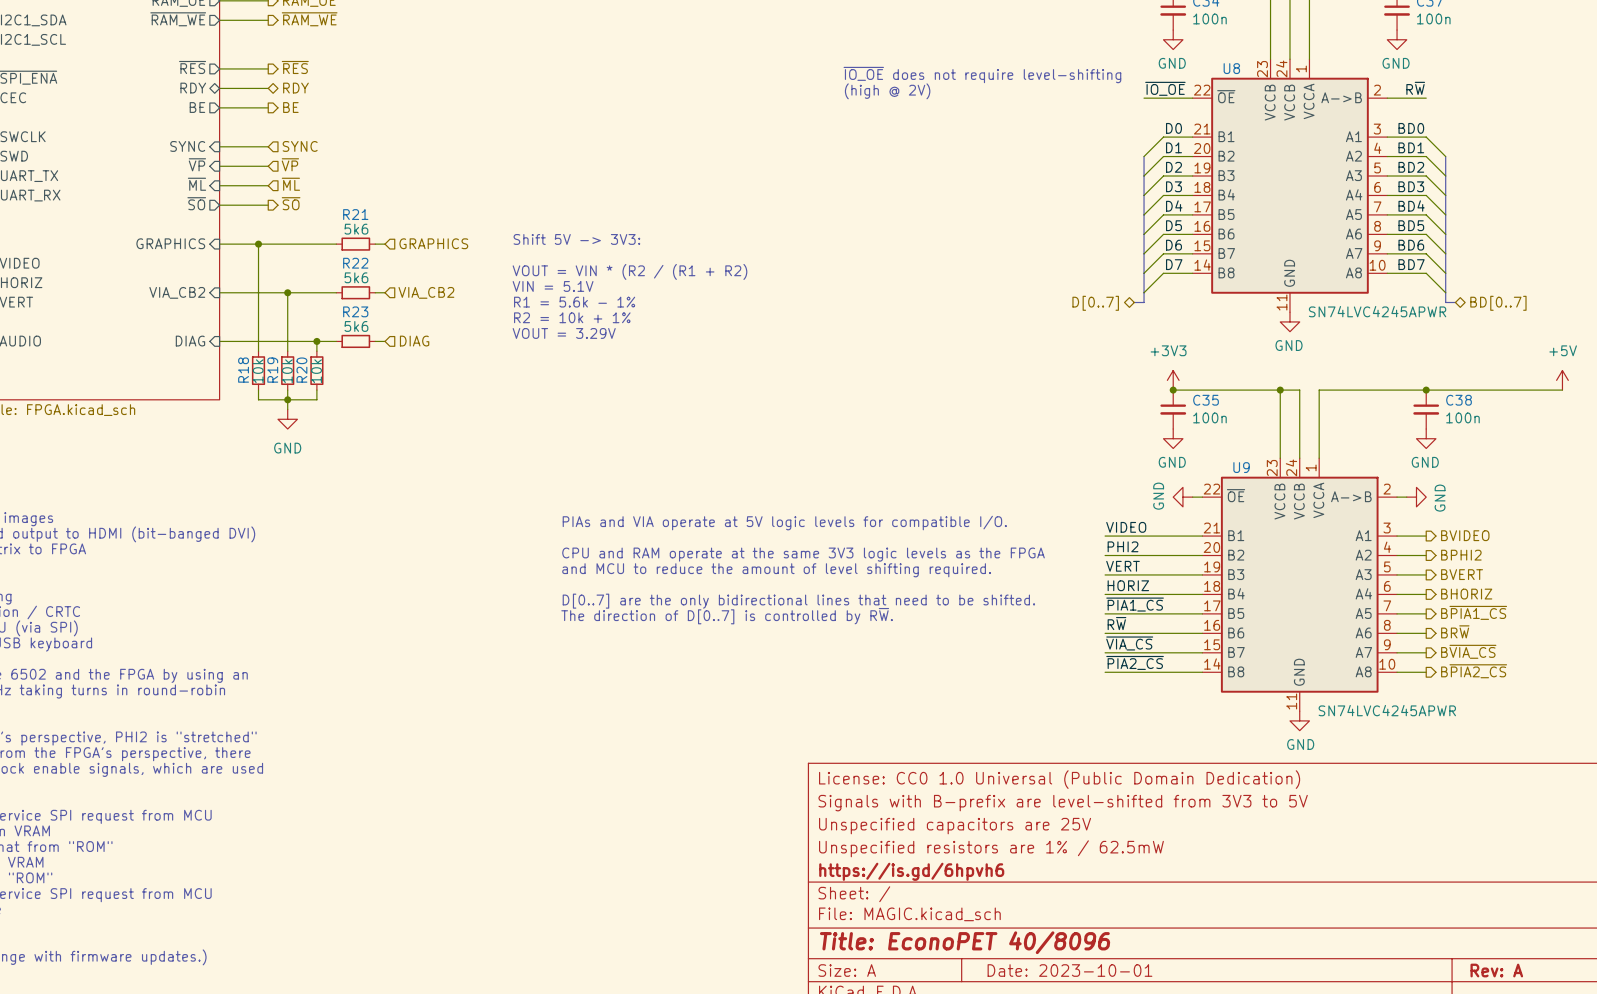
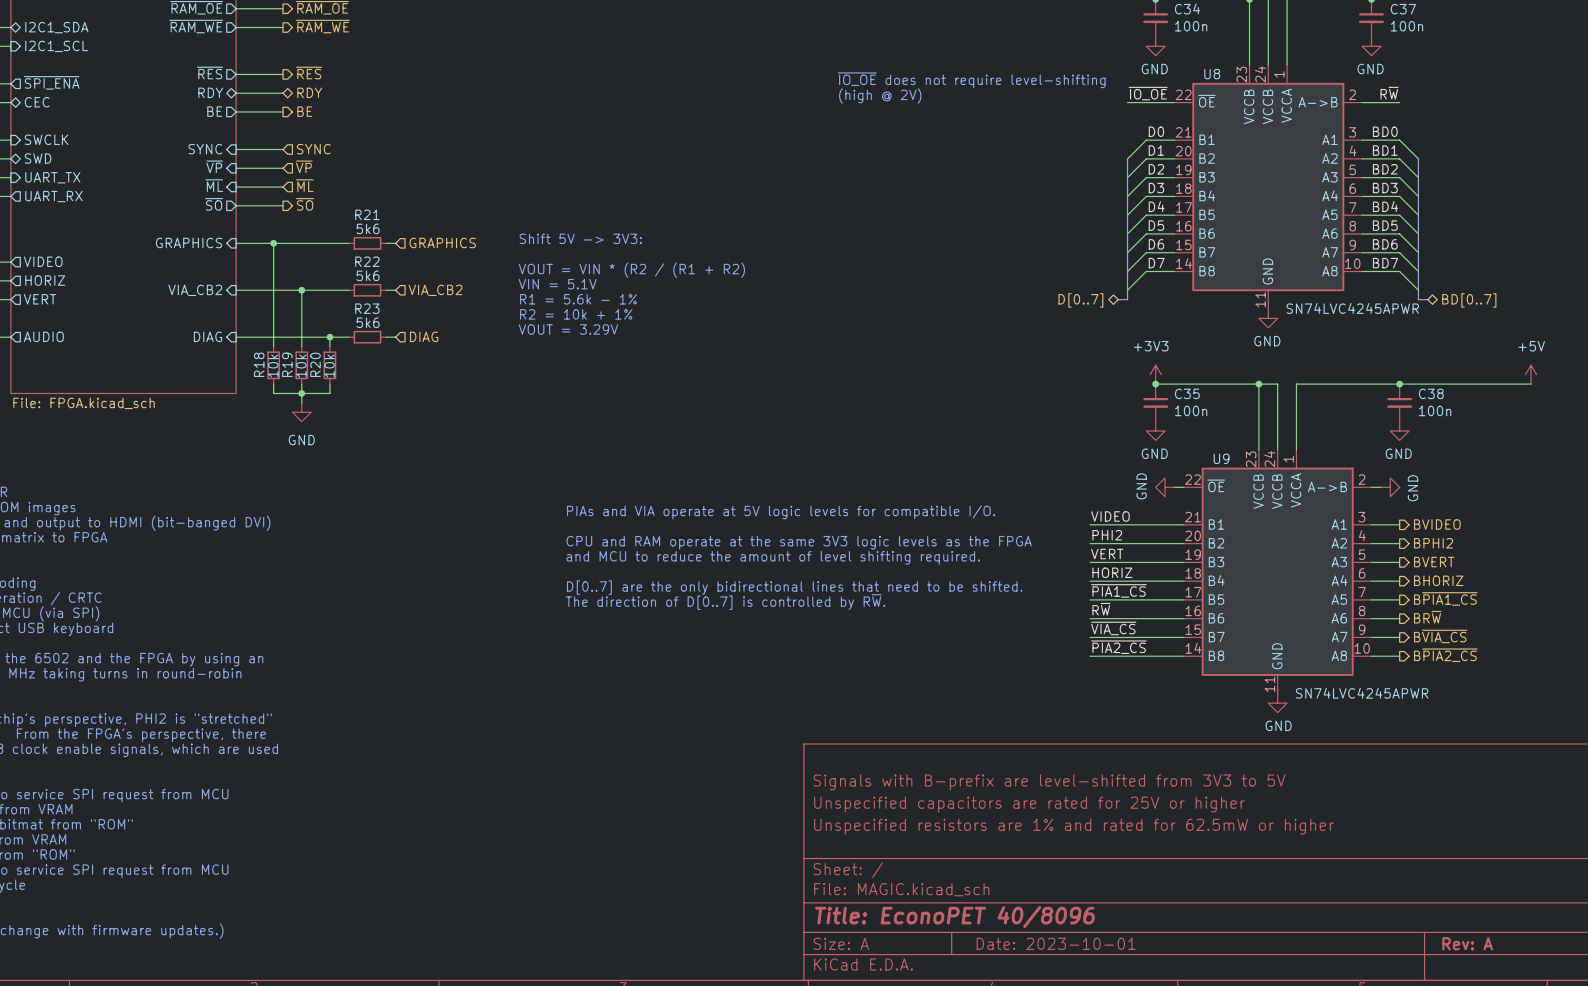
title block: License: CC0 1.0 Universal (Public Domain Dedication) (1059, 779) -> none
title block: Unspecified capacitors are 25V (955, 826) -> Unspecified capacitors are rated for 25V or higher (1029, 804)
title block: Unspecified resistors are 1% / 62.5mW (991, 848) -> Unspecified resistors are 1% and rated for 62.5mW or higher (1074, 826)
title block: https://is.gd/6hpvh6 (911, 871) -> none

